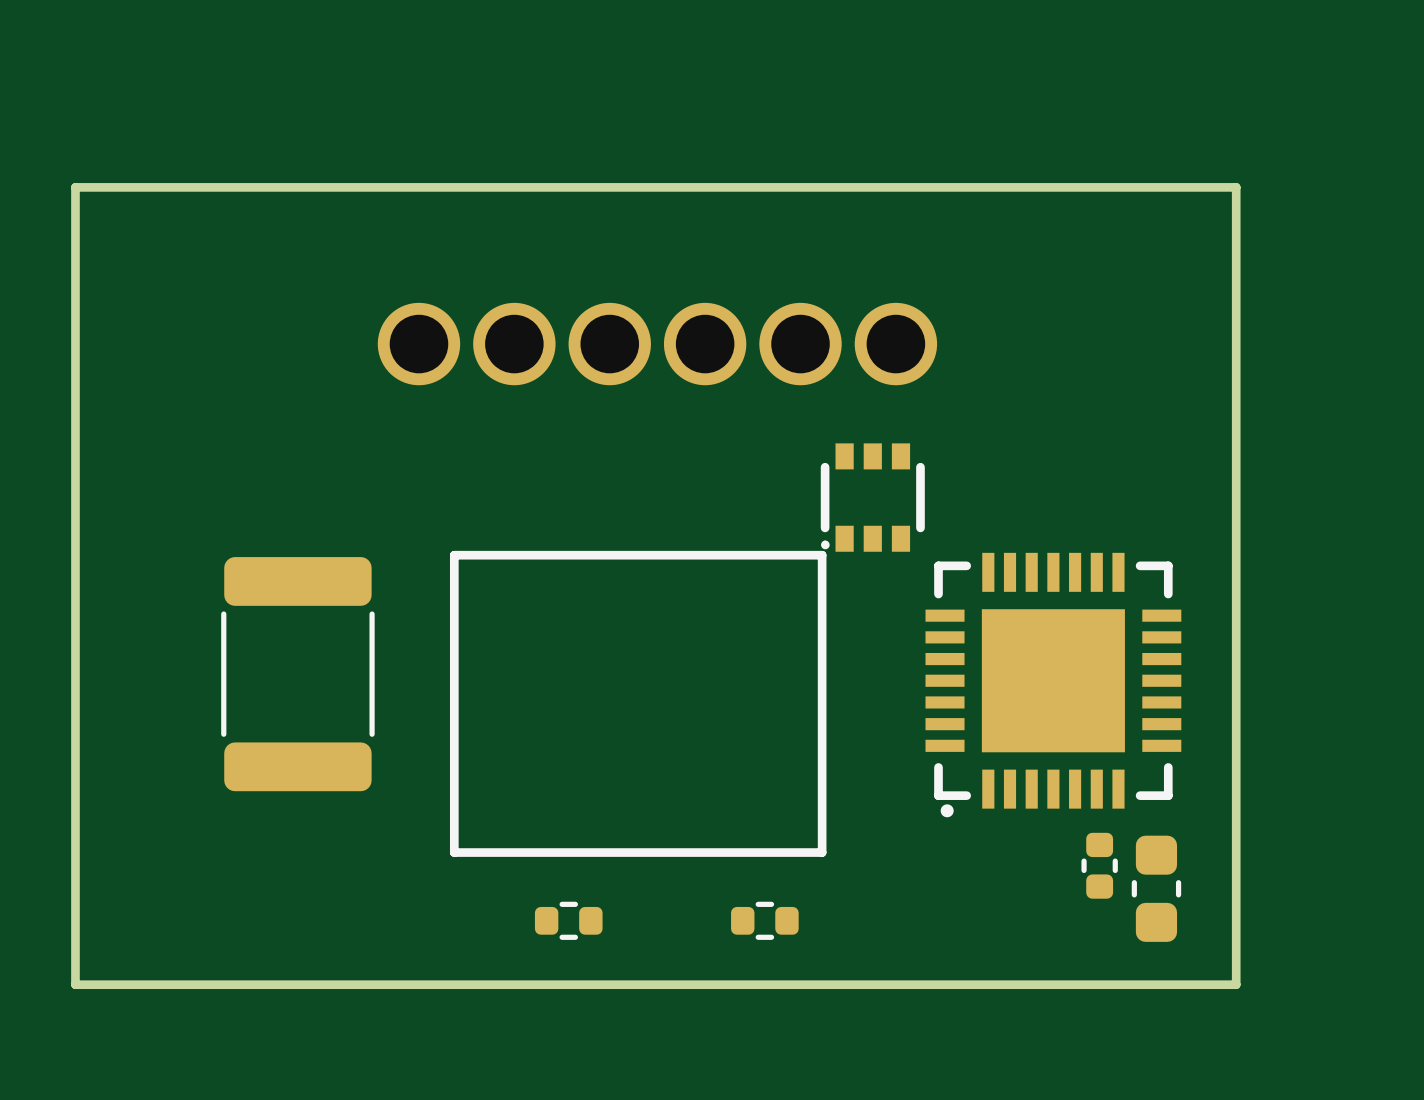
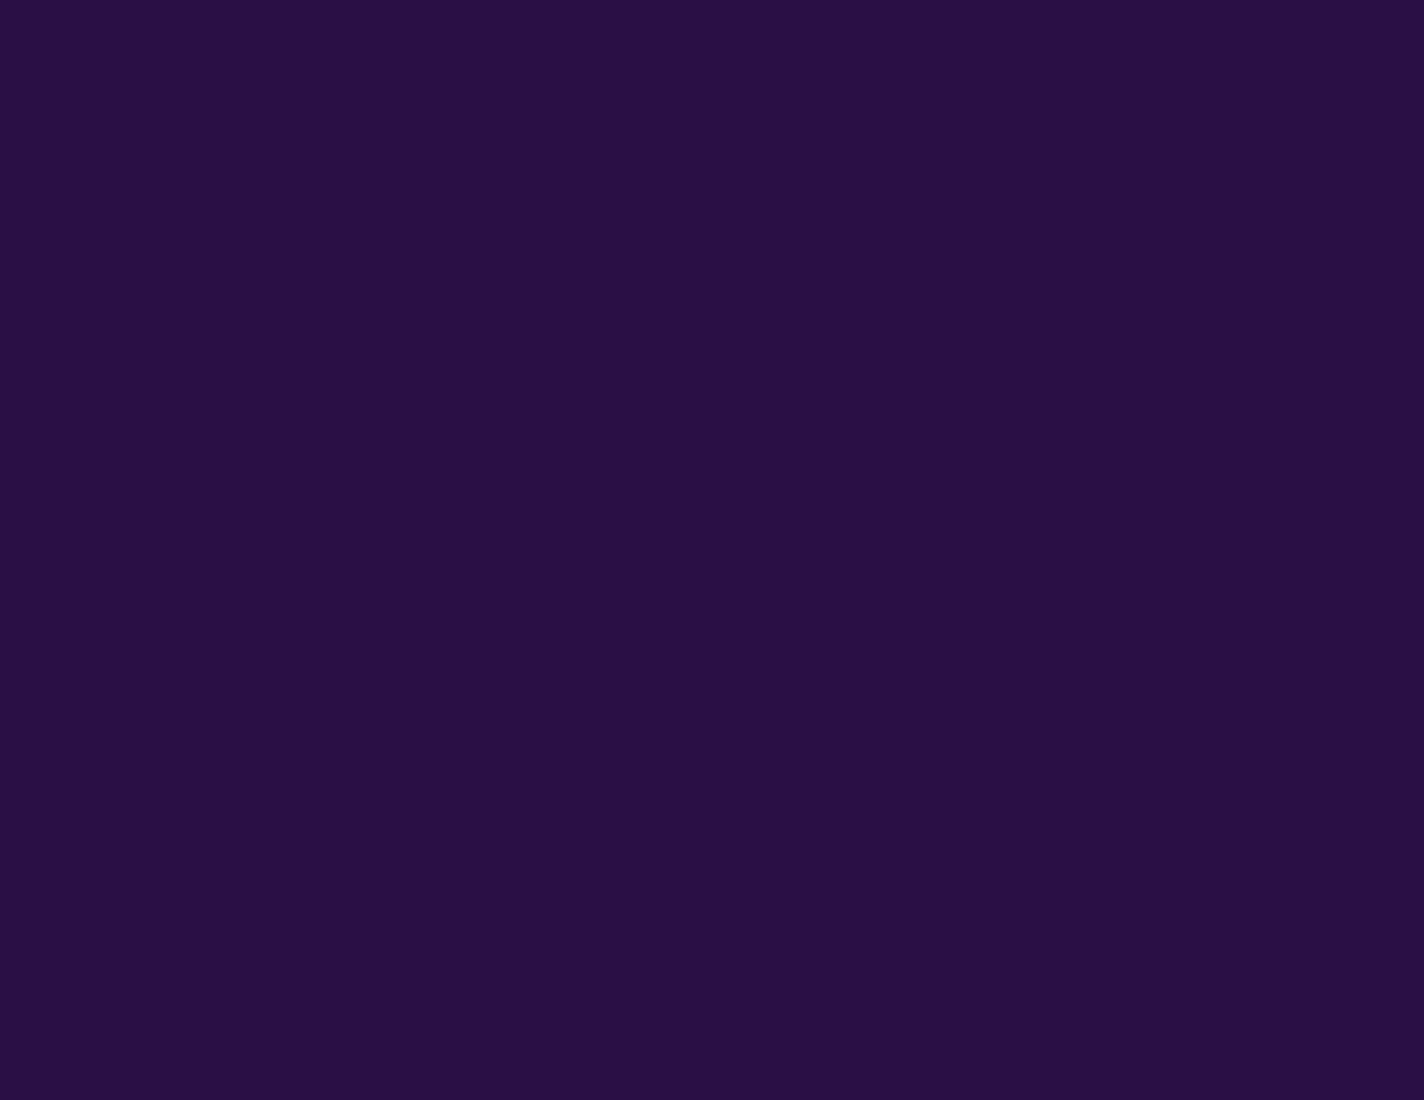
board edge: (75, 187) (1236, 187) (1236, 984) (75, 984) (75, 187) -> none
part: (657, 344) -> none
part: (872, 497) -> none
line: (454, 555) (822, 555) (822, 852) (454, 852) (454, 555) -> none
part: (297, 674) -> none
part: (1053, 685) -> none
part: (1099, 865) -> none
part: (1156, 888) -> none
part: (568, 920) -> none
part: (764, 920) -> none

